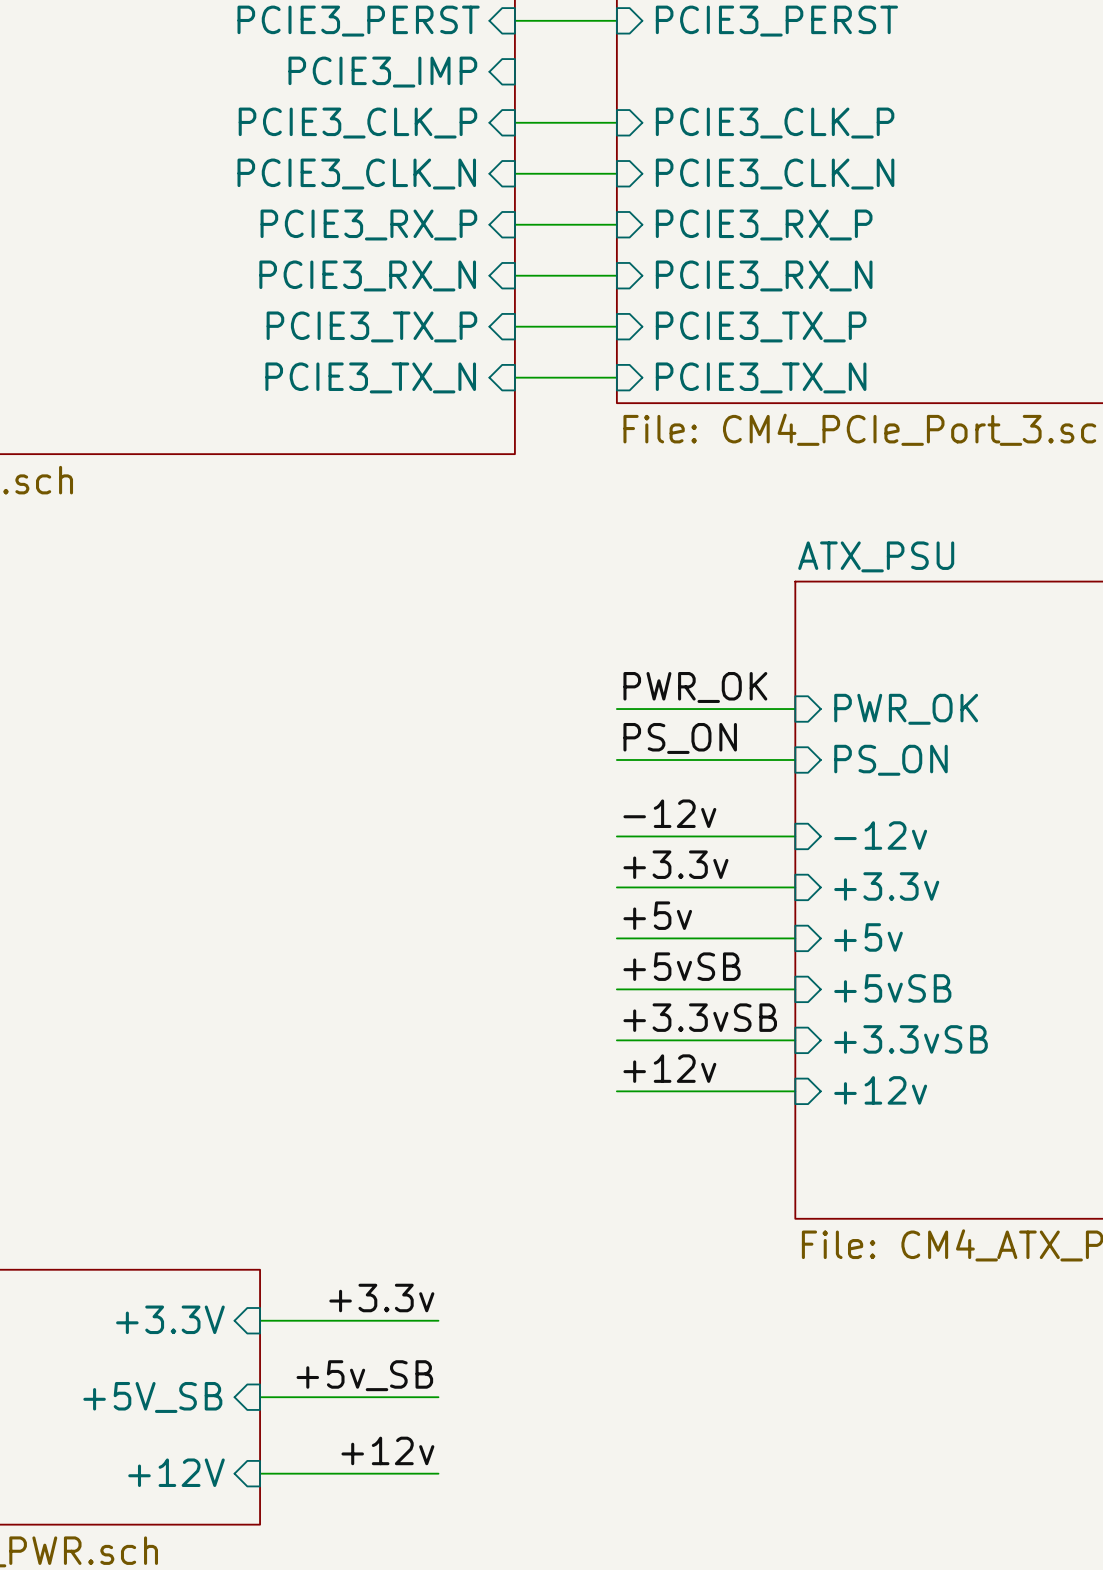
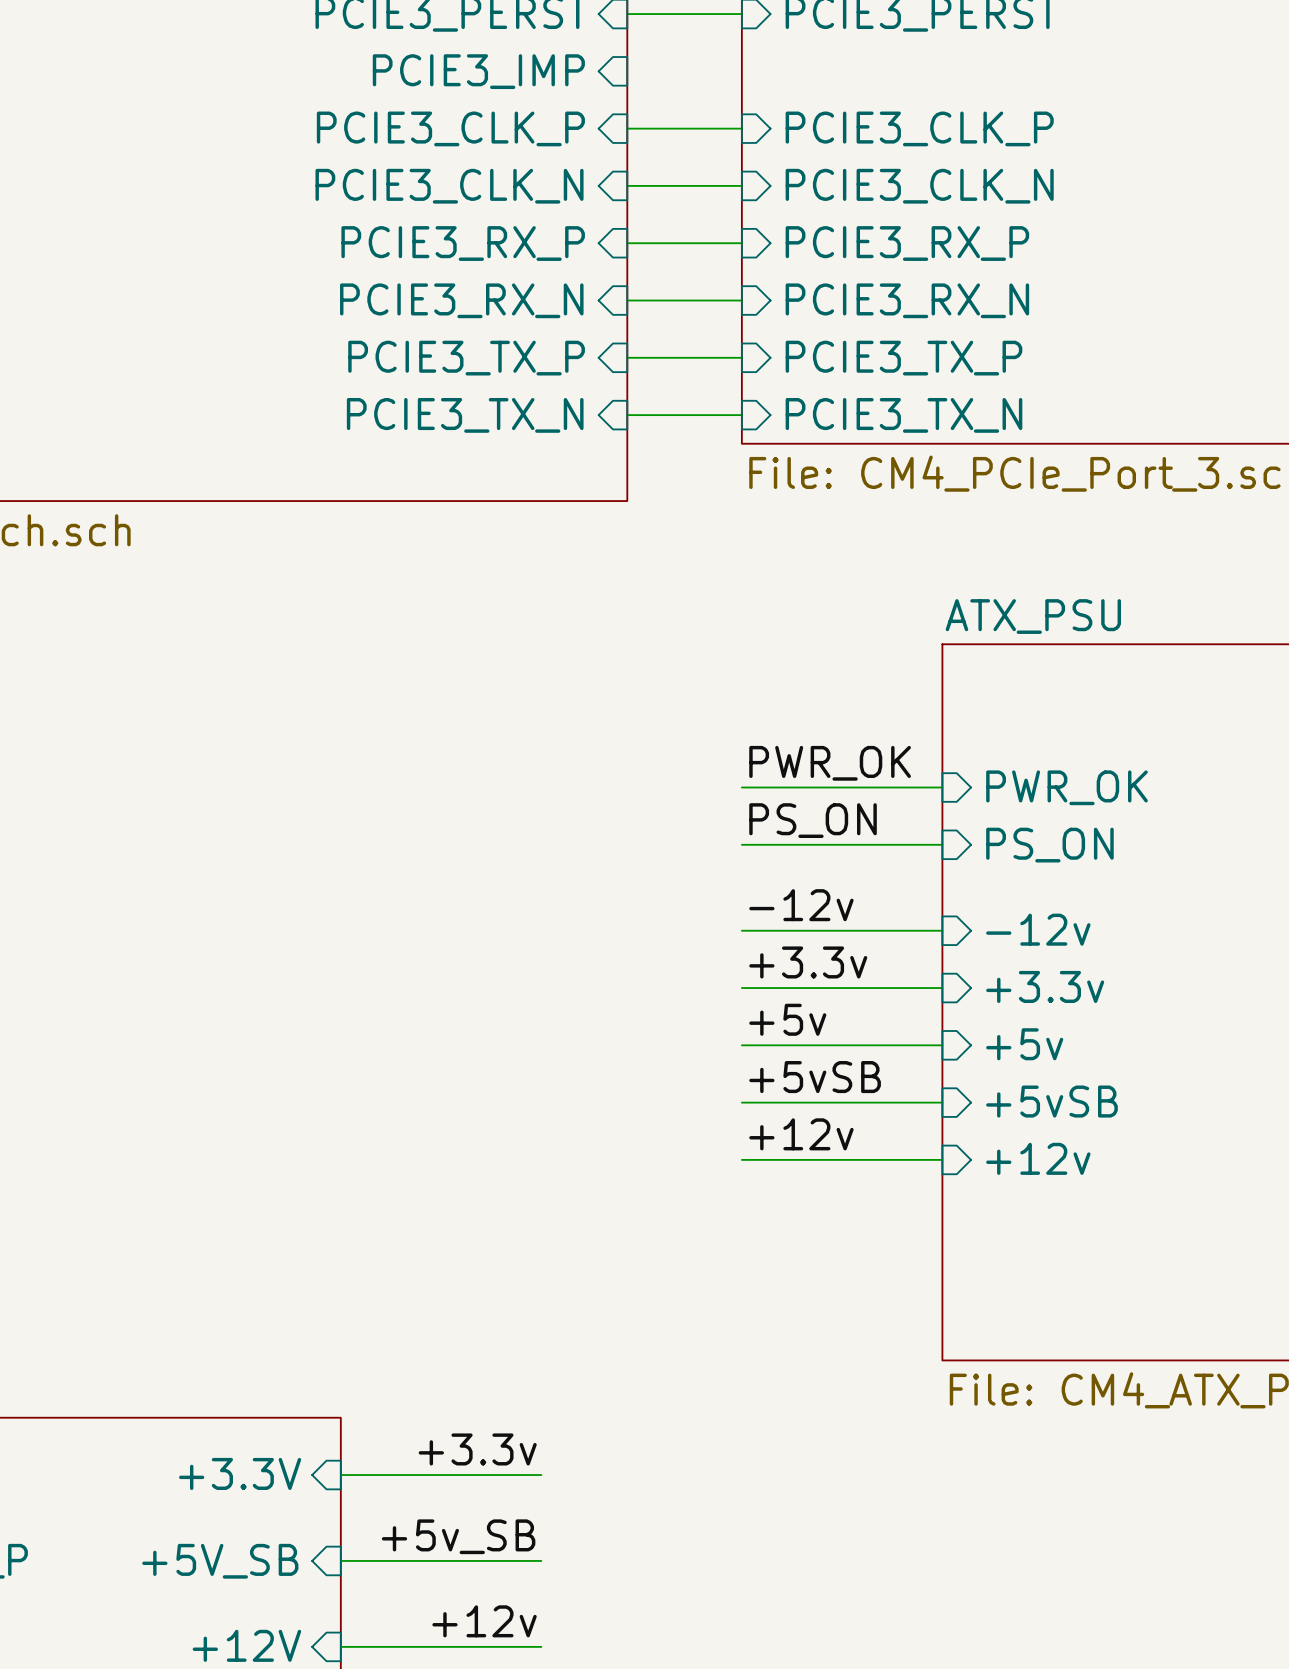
label: +3.3vSB (700, 1017) -> +12v (801, 1134)
sheet pin: +3.3vSB (911, 1039) -> +12v (1038, 1158)
label: +12v (669, 1068) -> none
sheet pin: +12v (880, 1090) -> none
wire: (616, 1091) (795, 1091) -> none

